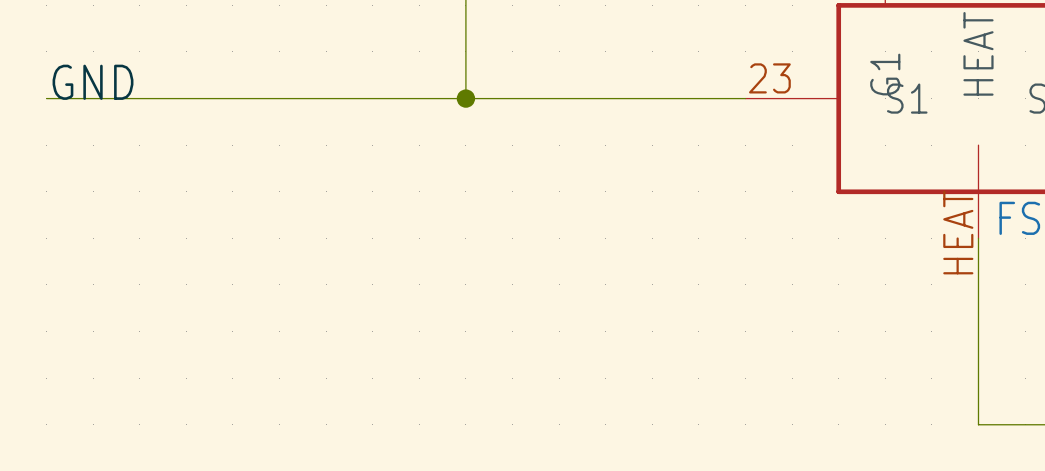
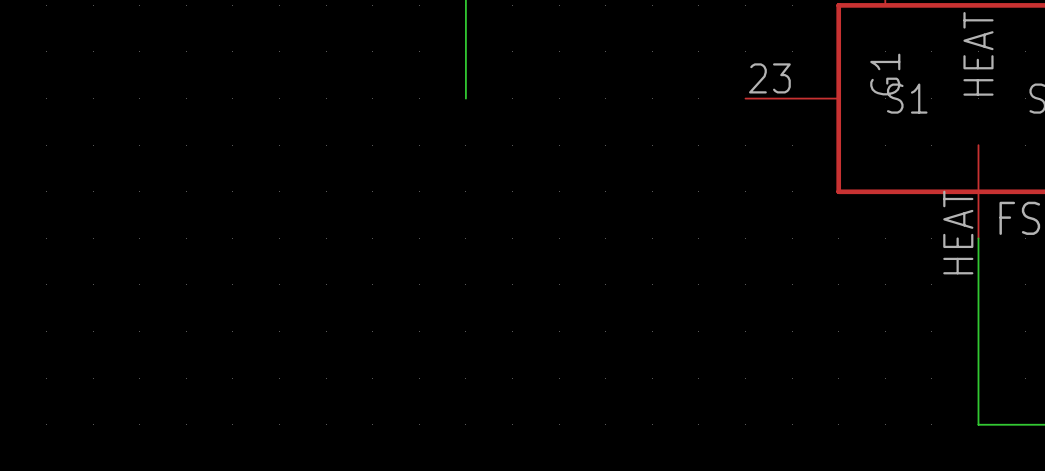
label: GND (93, 82) -> none
wire: (46, 98) (745, 98) -> none
junction: (465, 98) -> none

